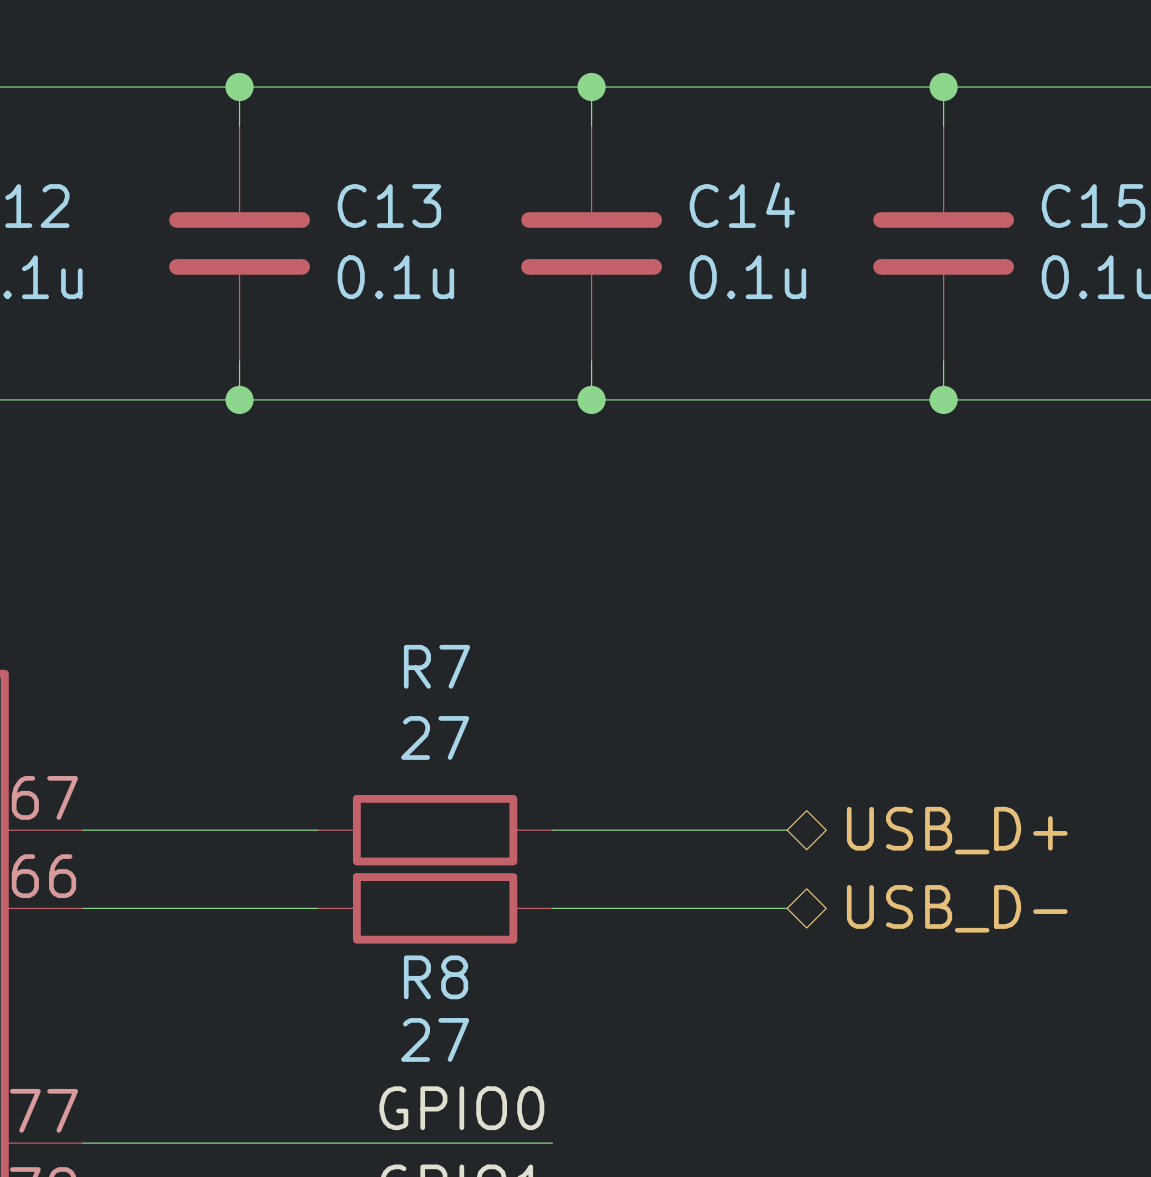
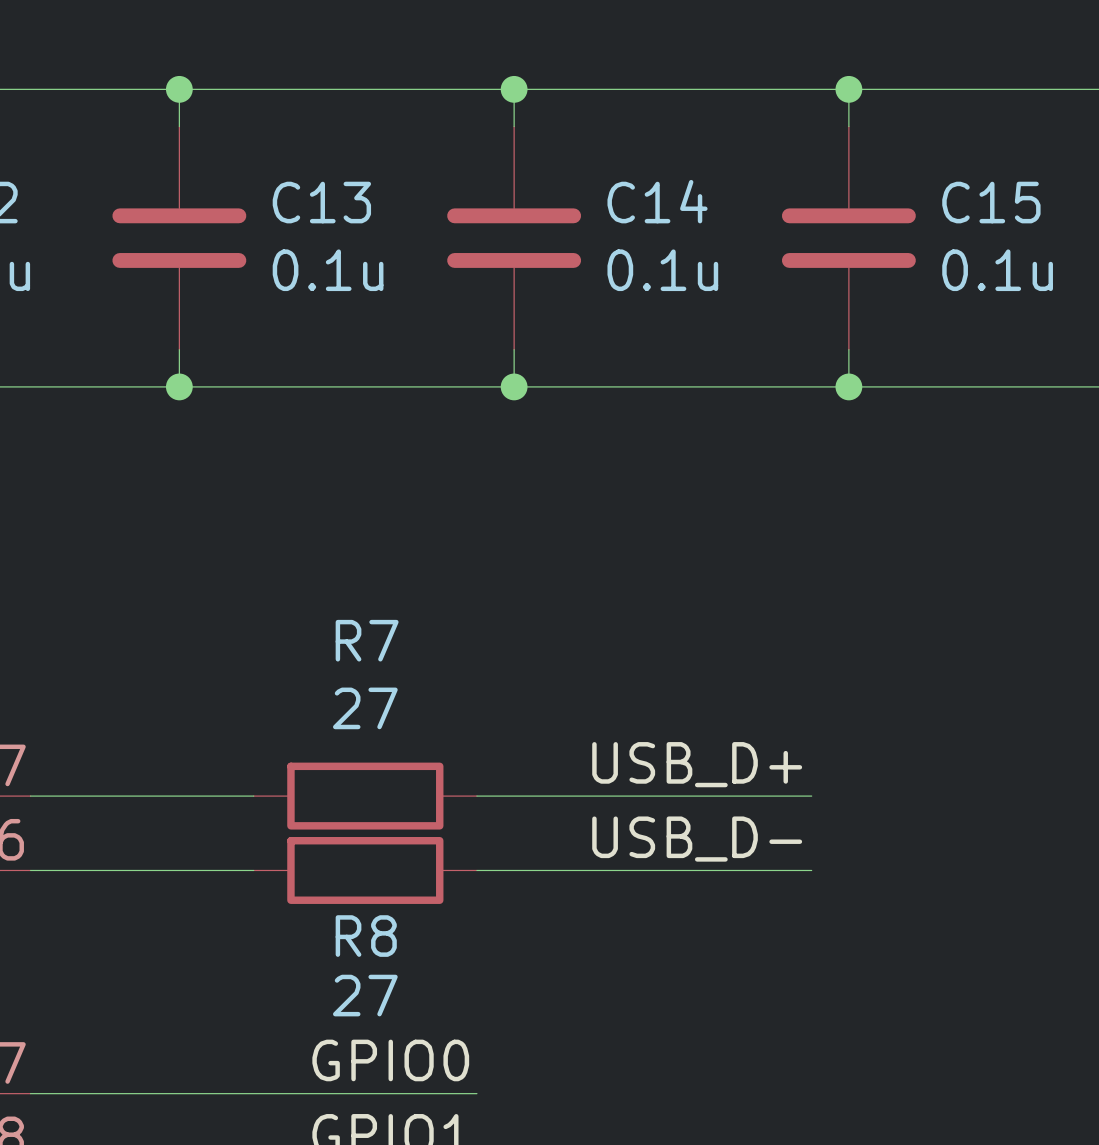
label: none -> USB_D+ (697, 764)
wire: none -> (700, 796) (811, 796)
hierarchical label: USB_D+ (957, 830) -> none
label: none -> USB_D- (697, 839)
wire: none -> (700, 870) (811, 870)
hierarchical label: USB_D- (957, 908) -> none

